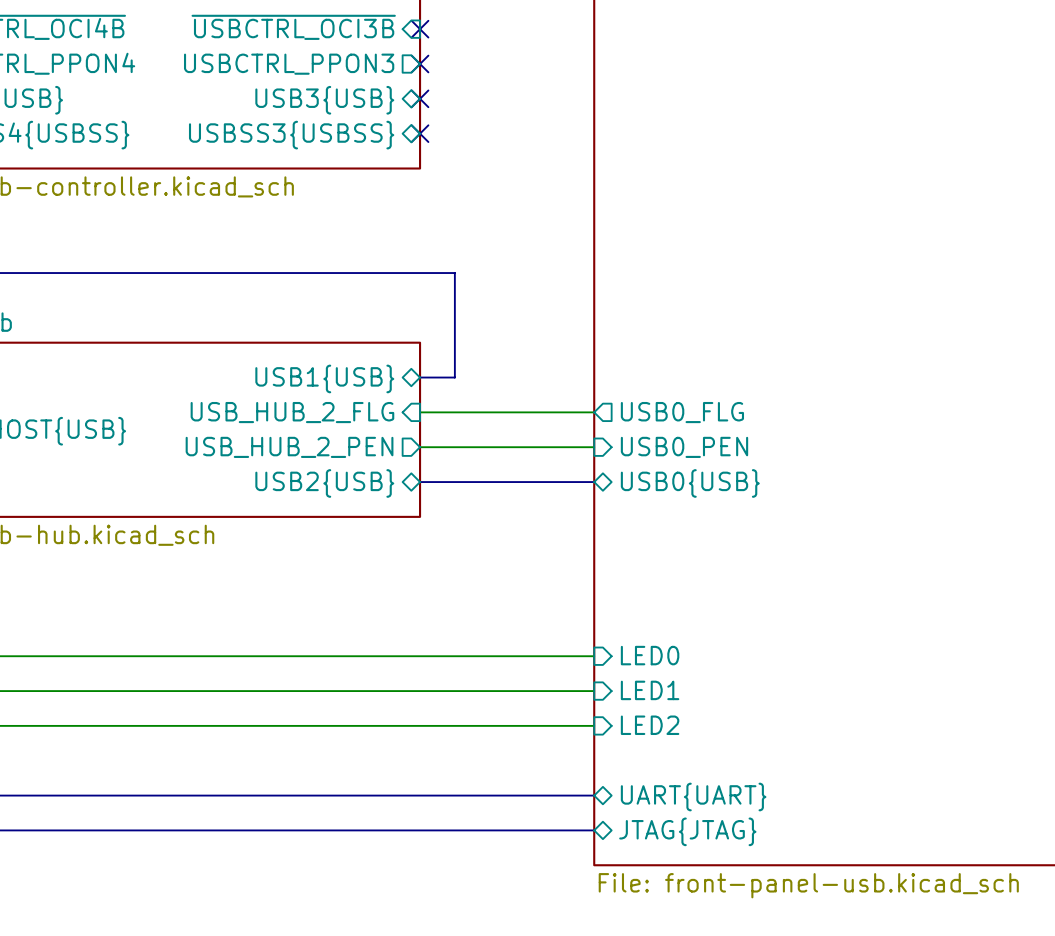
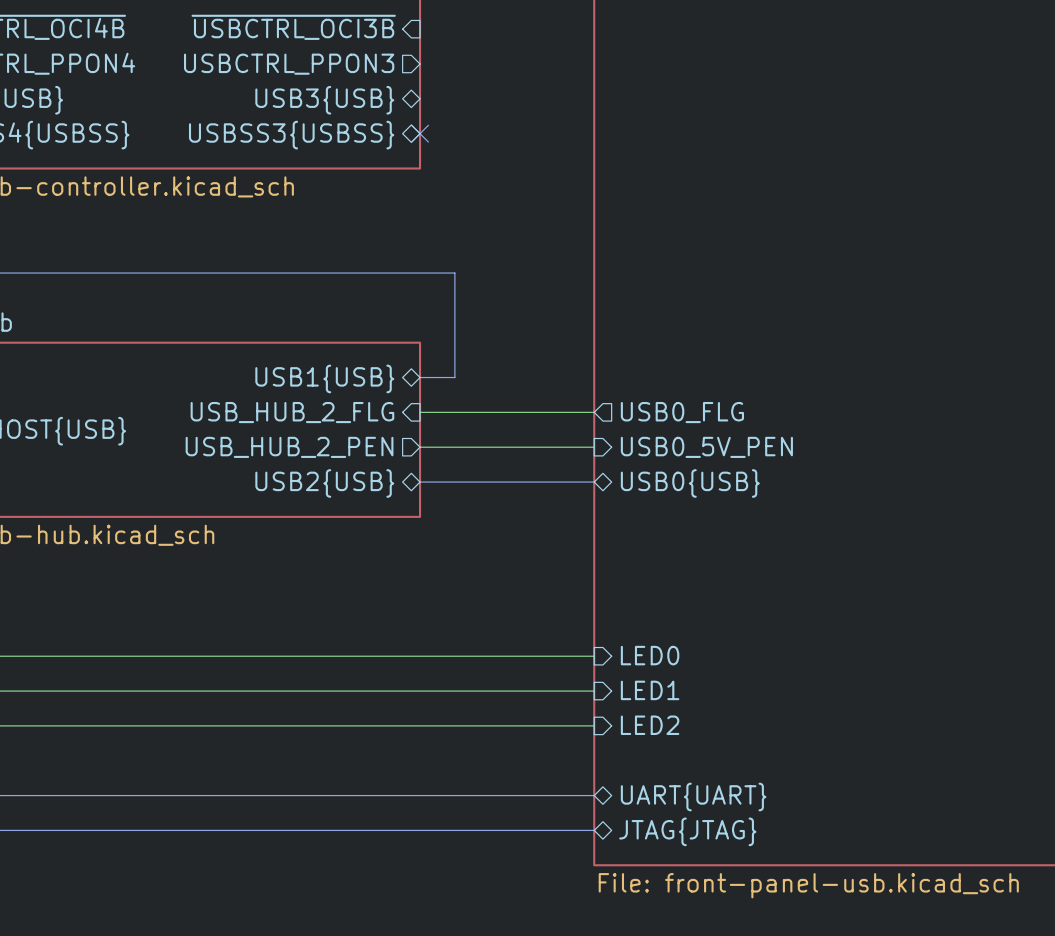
no-connect mark: (420, 29) -> none
no-connect mark: (420, 63) -> none
no-connect mark: (420, 98) -> none
sheet pin: USB0_PEN (684, 447) -> USB0_5V_PEN (706, 447)

